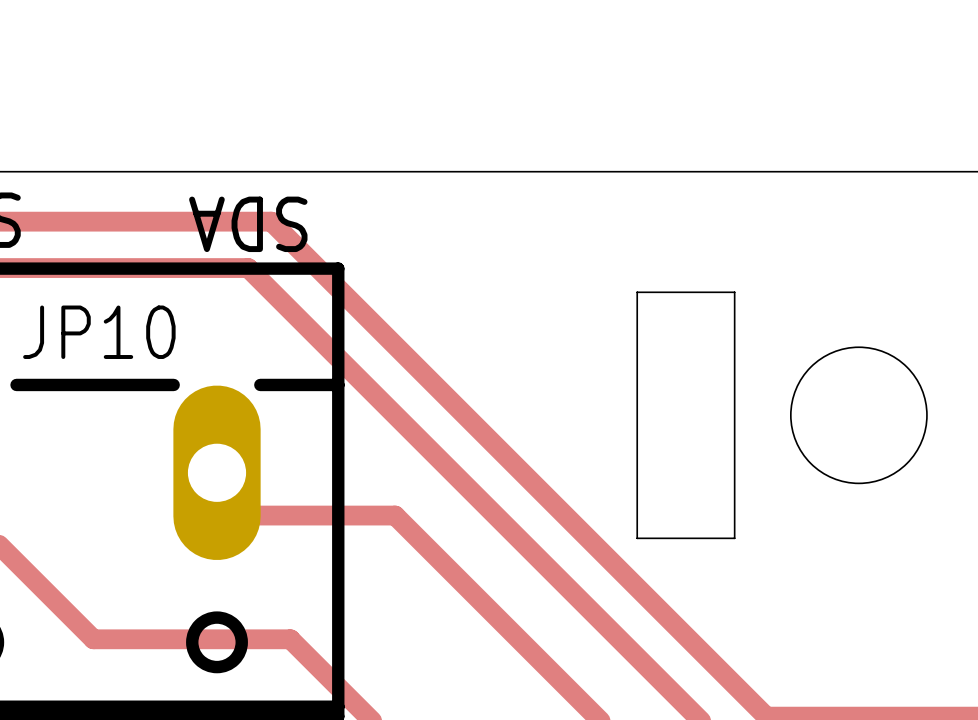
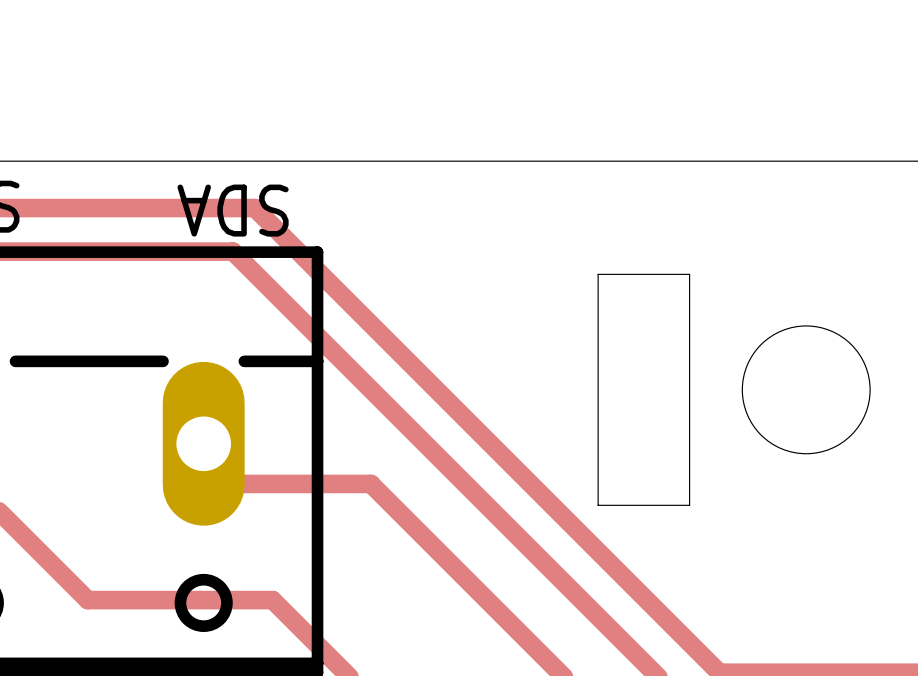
text: JP10 (99, 332) -> none

